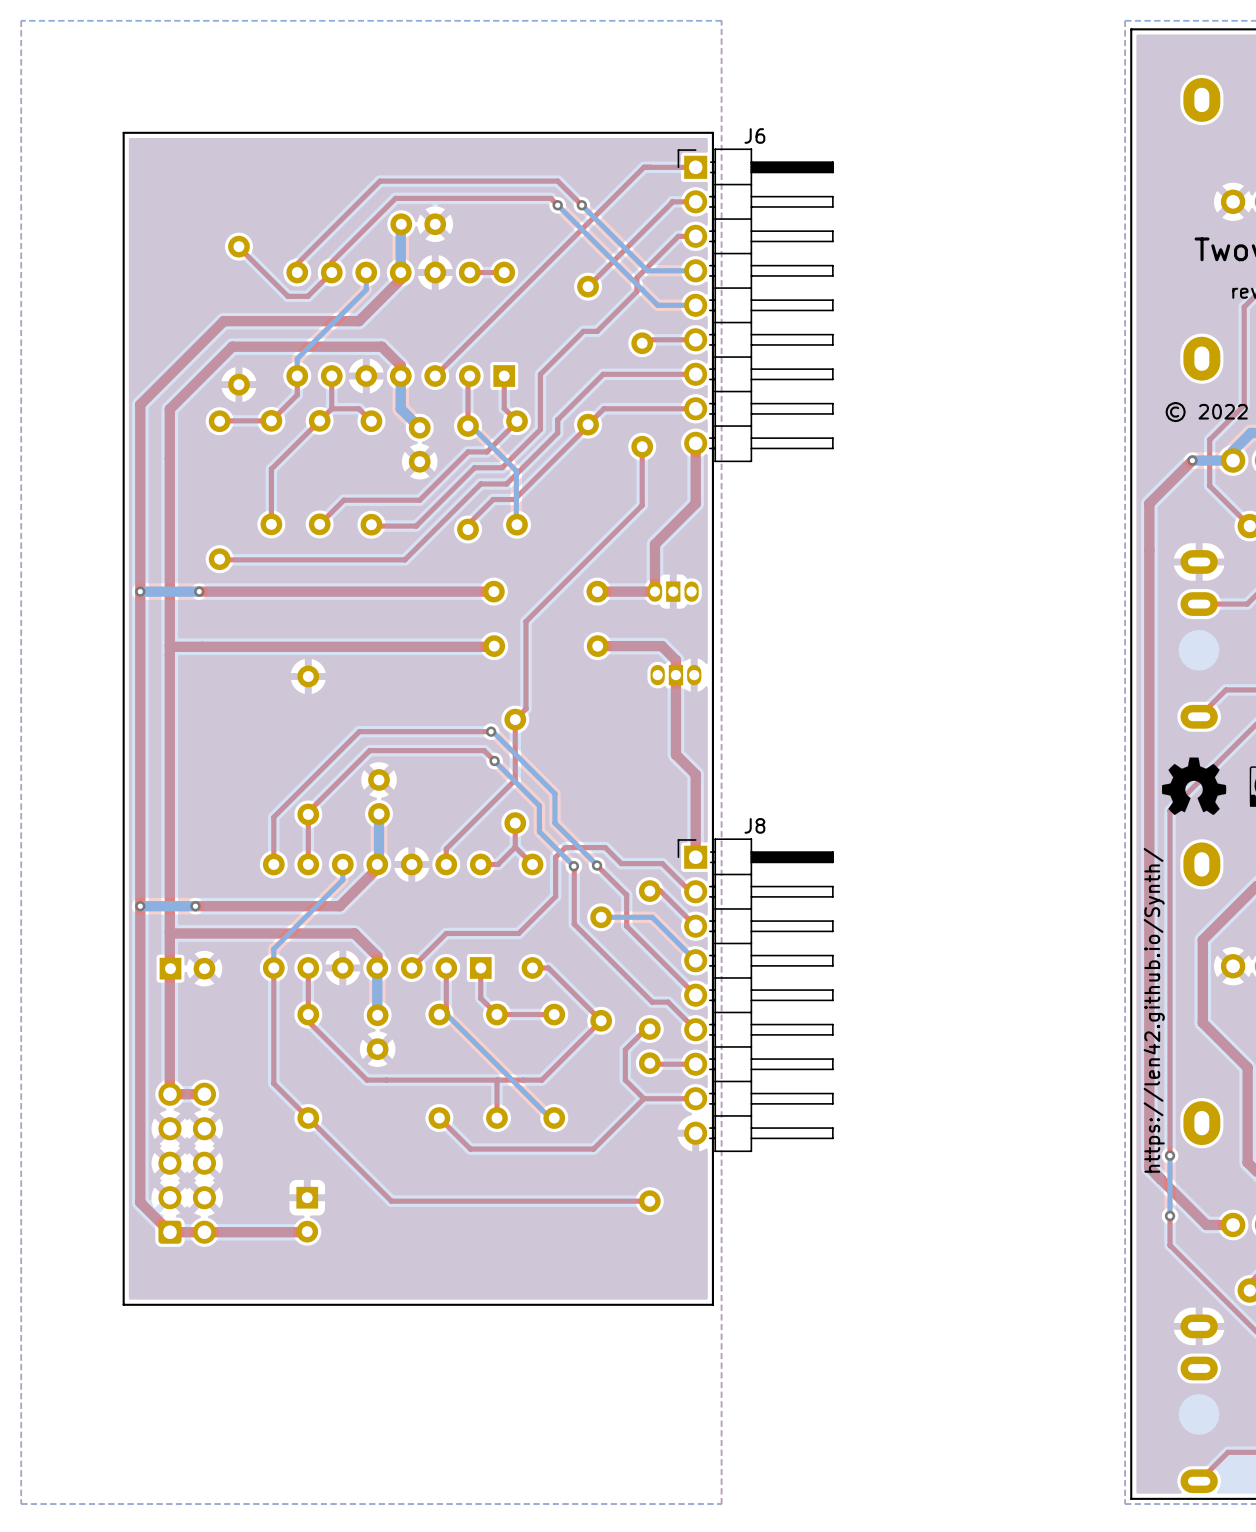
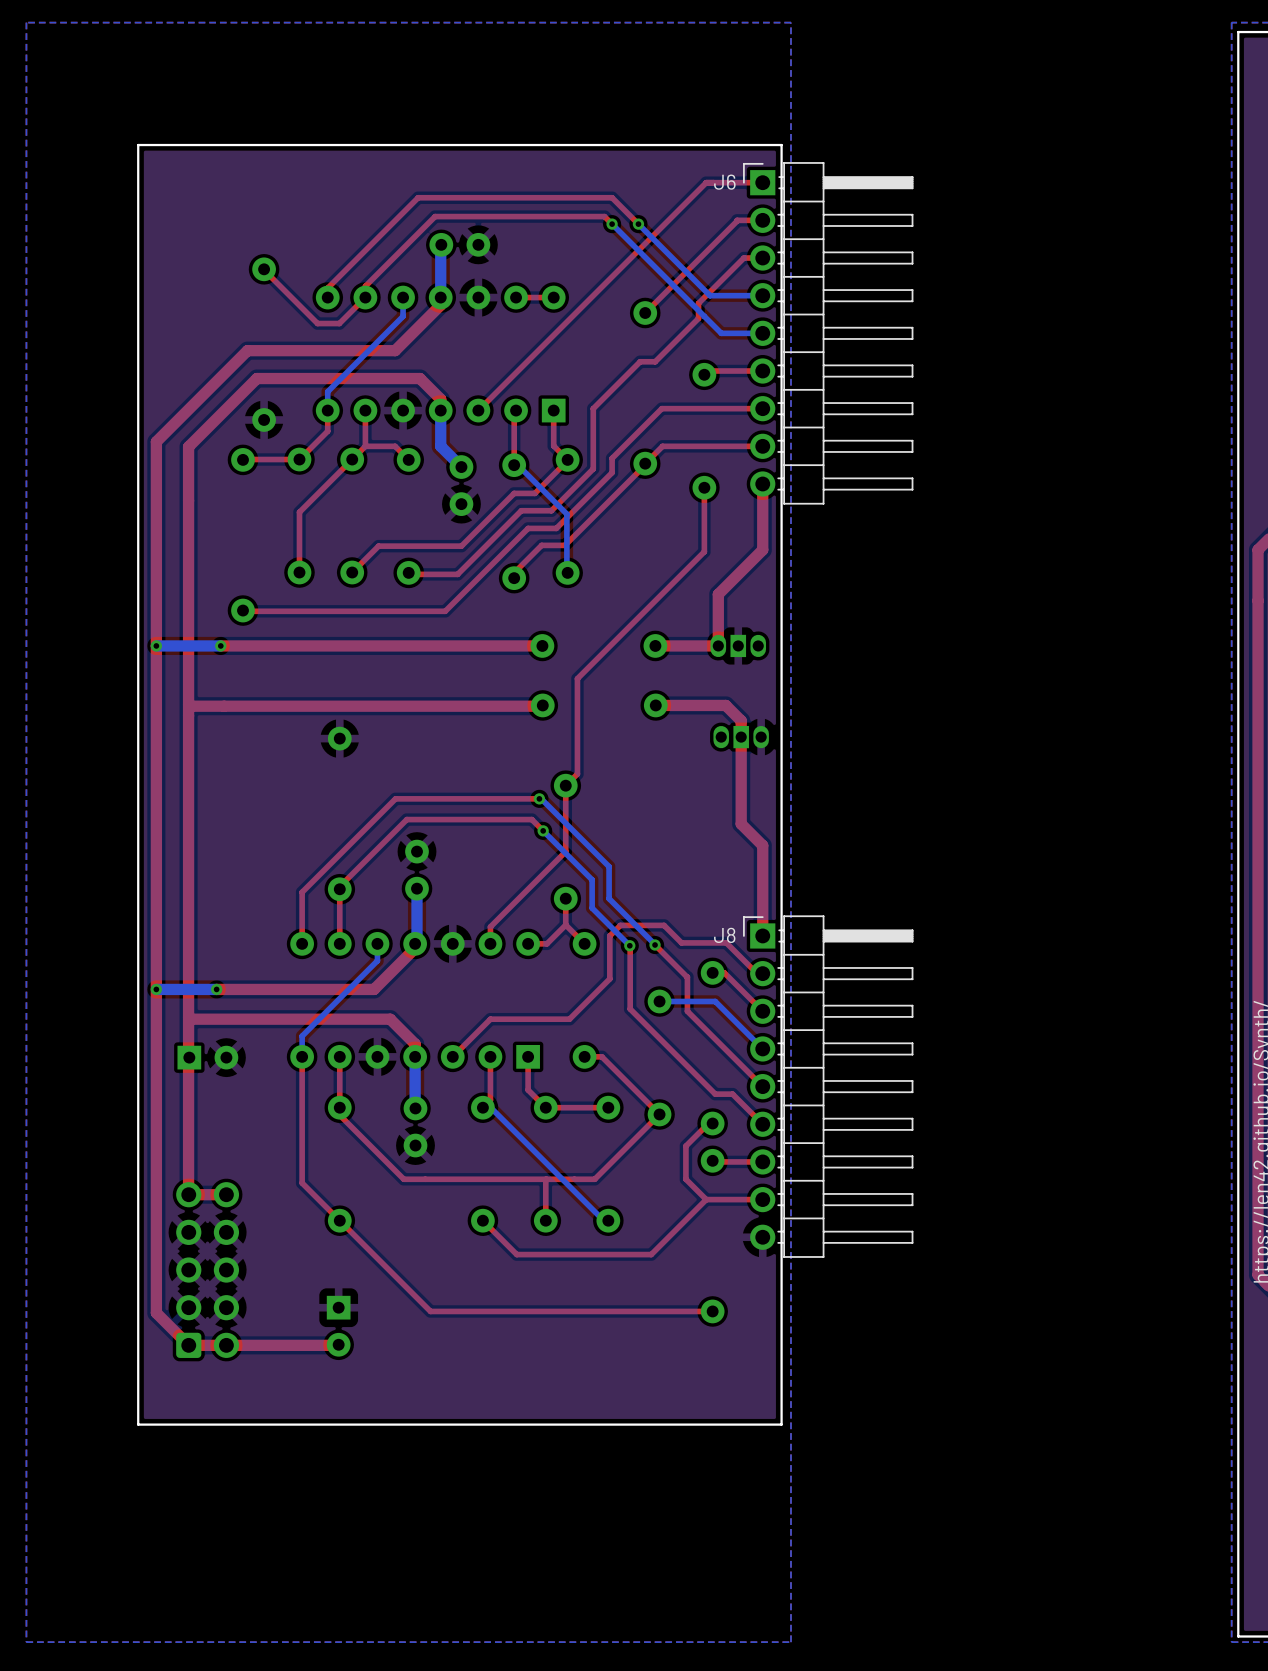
J6 name position: J6 (754, 135) -> J6 (724, 182)
J8 name position: J8 (754, 825) -> J8 (724, 935)

